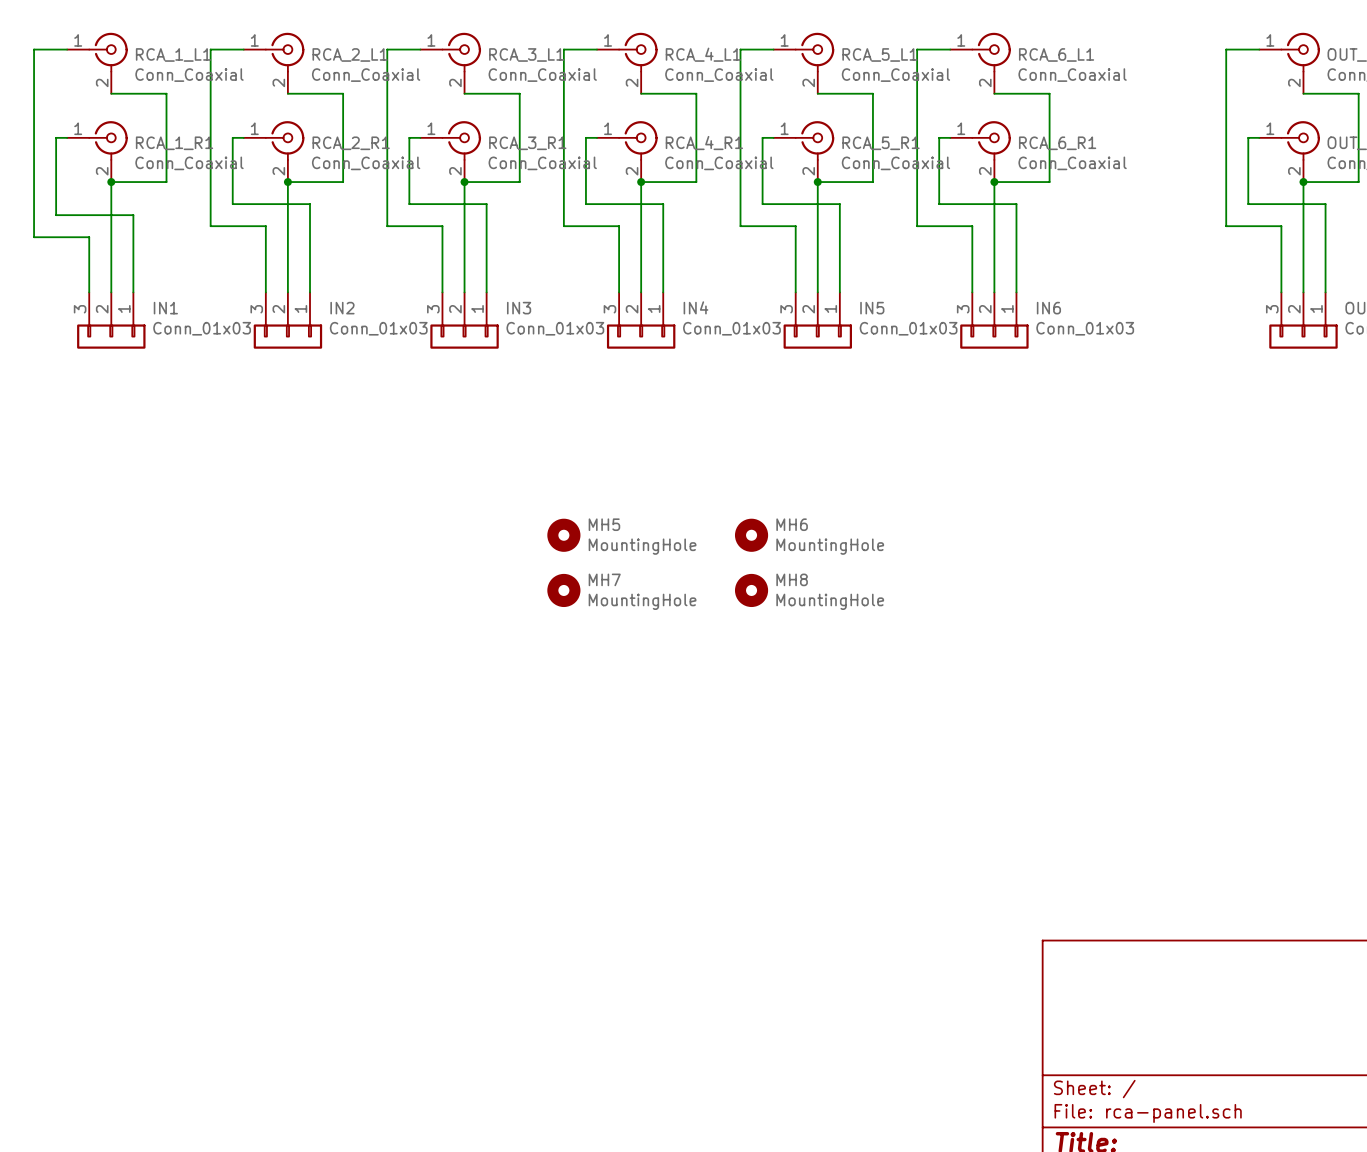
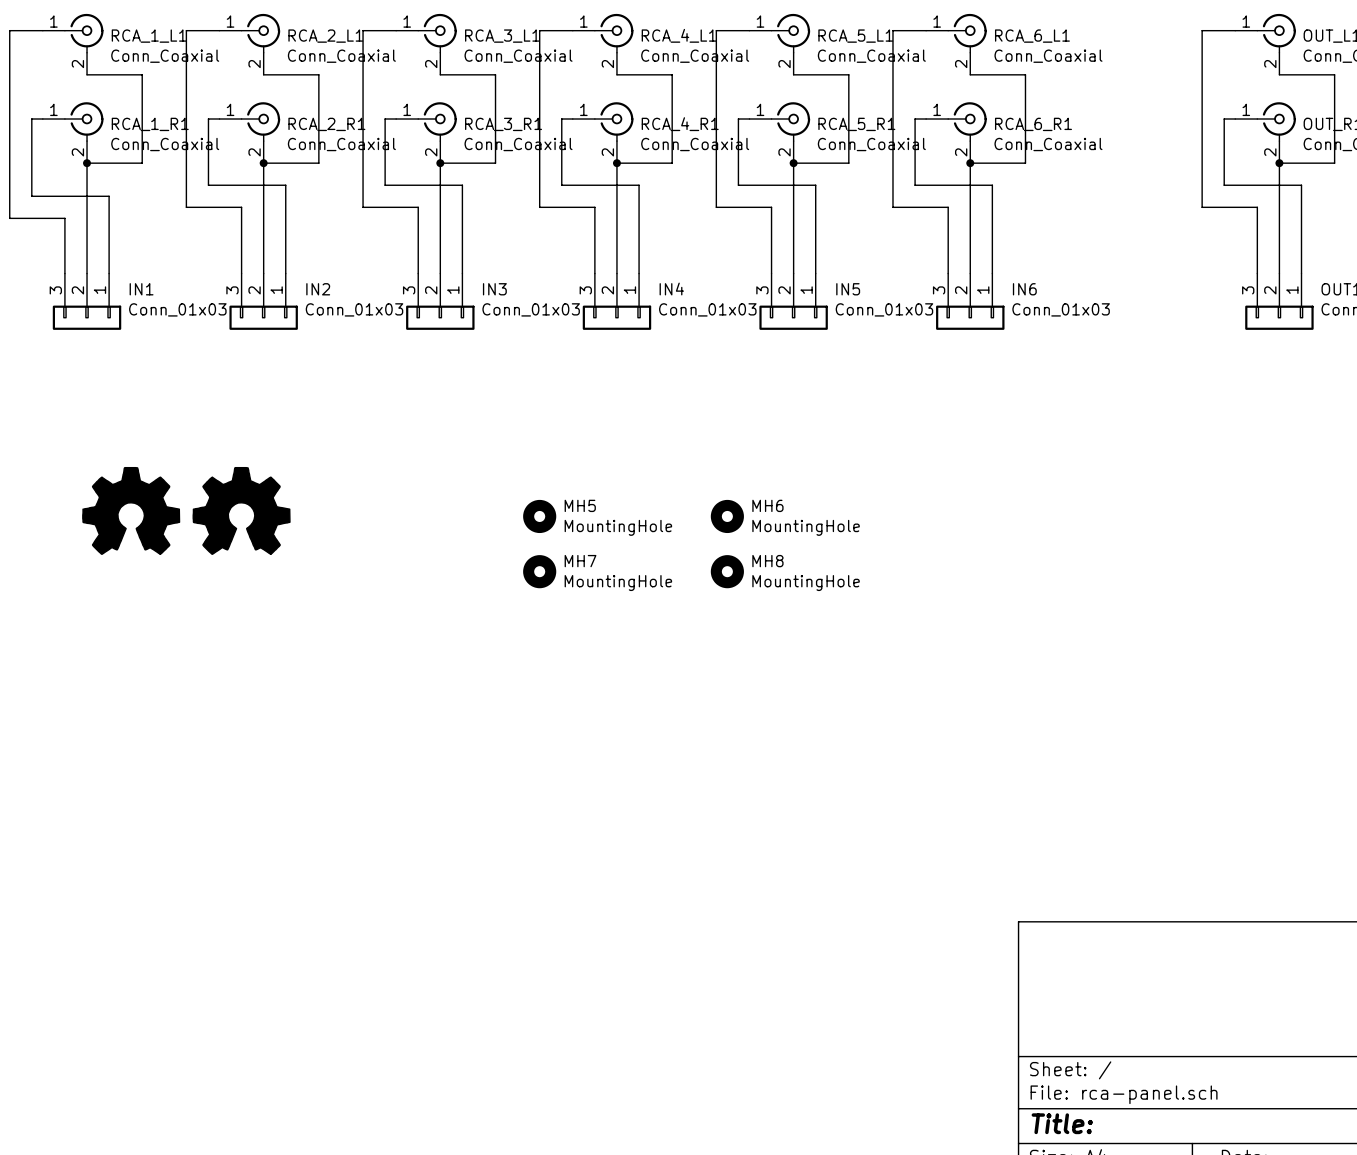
part: none -> (131, 510)
part: none -> (241, 510)

